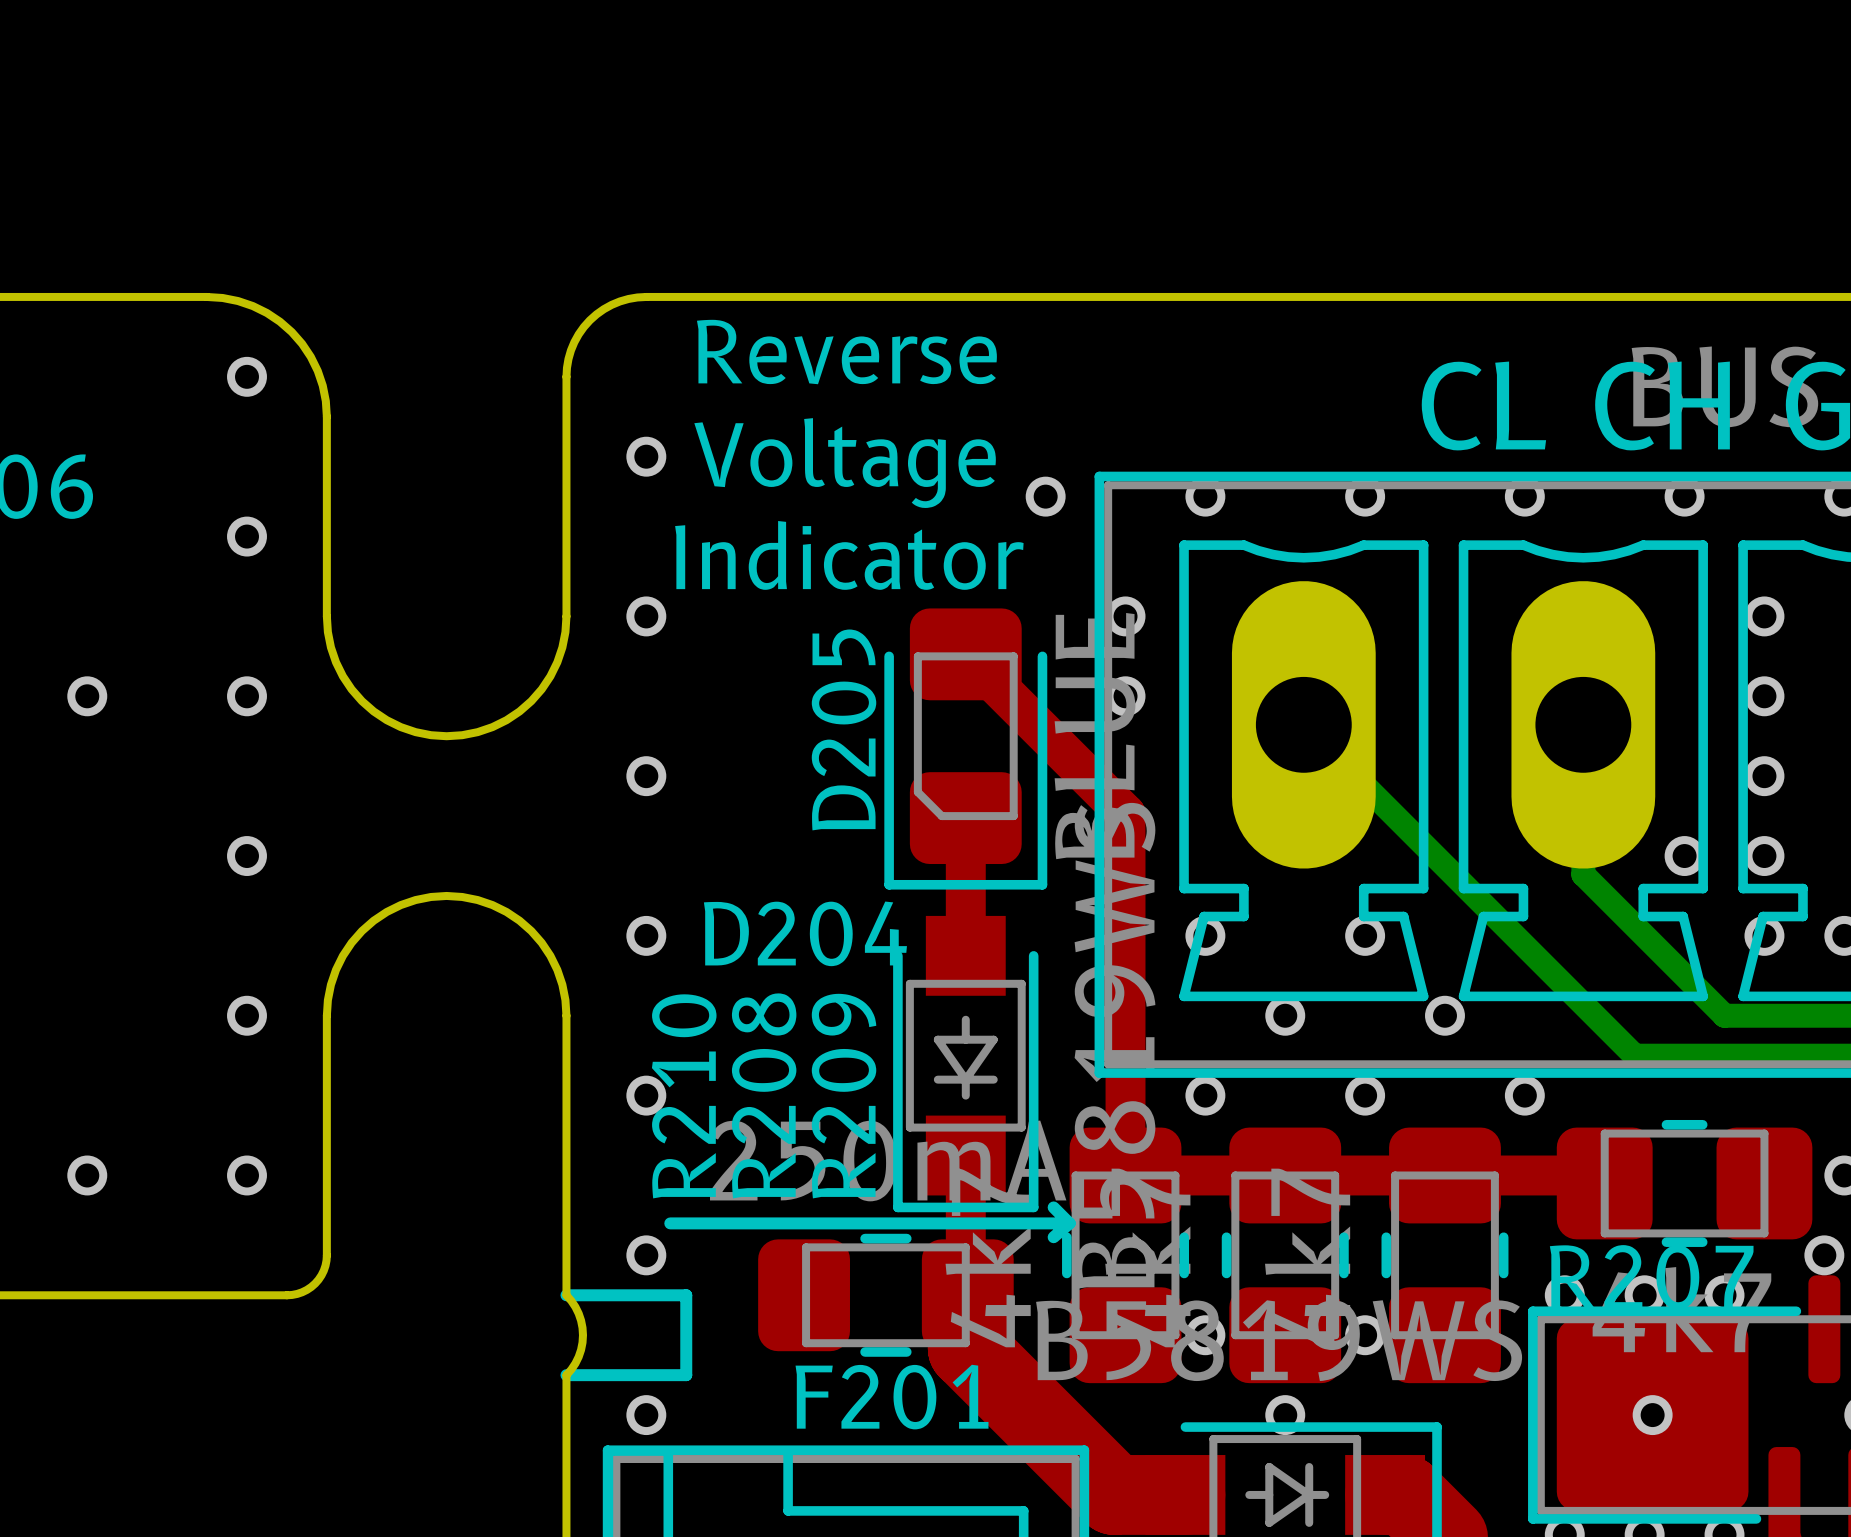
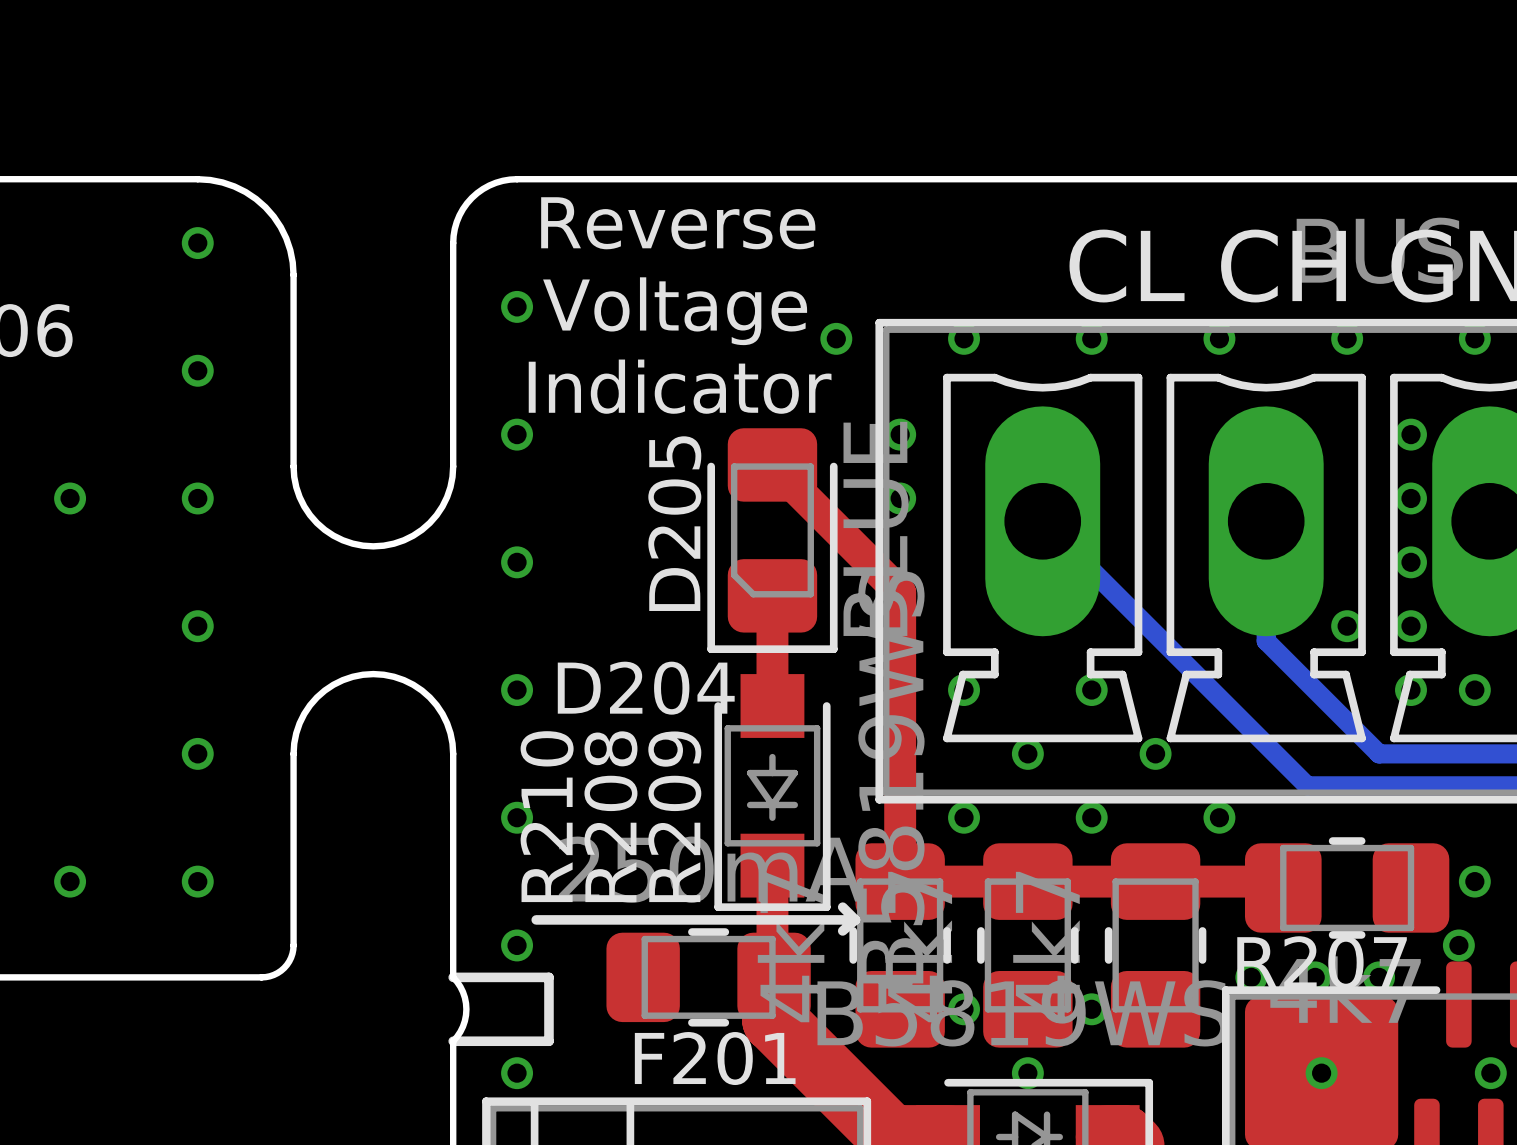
board edge: (207, 296) (238, 301) (266, 313) (291, 332) (302, 343) (317, 370) (322, 385) (326, 416) (327, 632) (335, 662) (351, 689) (361, 701) (386, 720) (400, 727) (431, 735) (462, 735) (492, 727) (519, 711) (541, 689) (550, 676) (562, 647) (566, 616) -> (165, 179) (210, 180) (234, 186) (256, 199) (265, 207) (280, 227) (286, 238) (290, 250) (293, 274) (294, 476) (299, 497) (316, 522) (342, 540) (362, 545) (383, 545) (413, 535) (436, 515) (447, 497) (452, 476) (453, 434)
board edge: (566, 1015) (562, 984) (550, 955) (541, 942) (519, 920) (492, 905) (462, 896) (431, 896) (400, 905) (386, 912) (361, 931) (342, 955) (335, 969) (327, 1000) (325, 1265) (321, 1275) (311, 1287) (297, 1293) (286, 1295) -> (453, 753) (447, 723) (436, 705) (421, 690) (403, 680) (383, 674) (362, 674) (342, 680) (316, 697) (299, 723) (294, 743) (292, 953) (286, 964) (273, 974) (261, 977) (229, 977)

